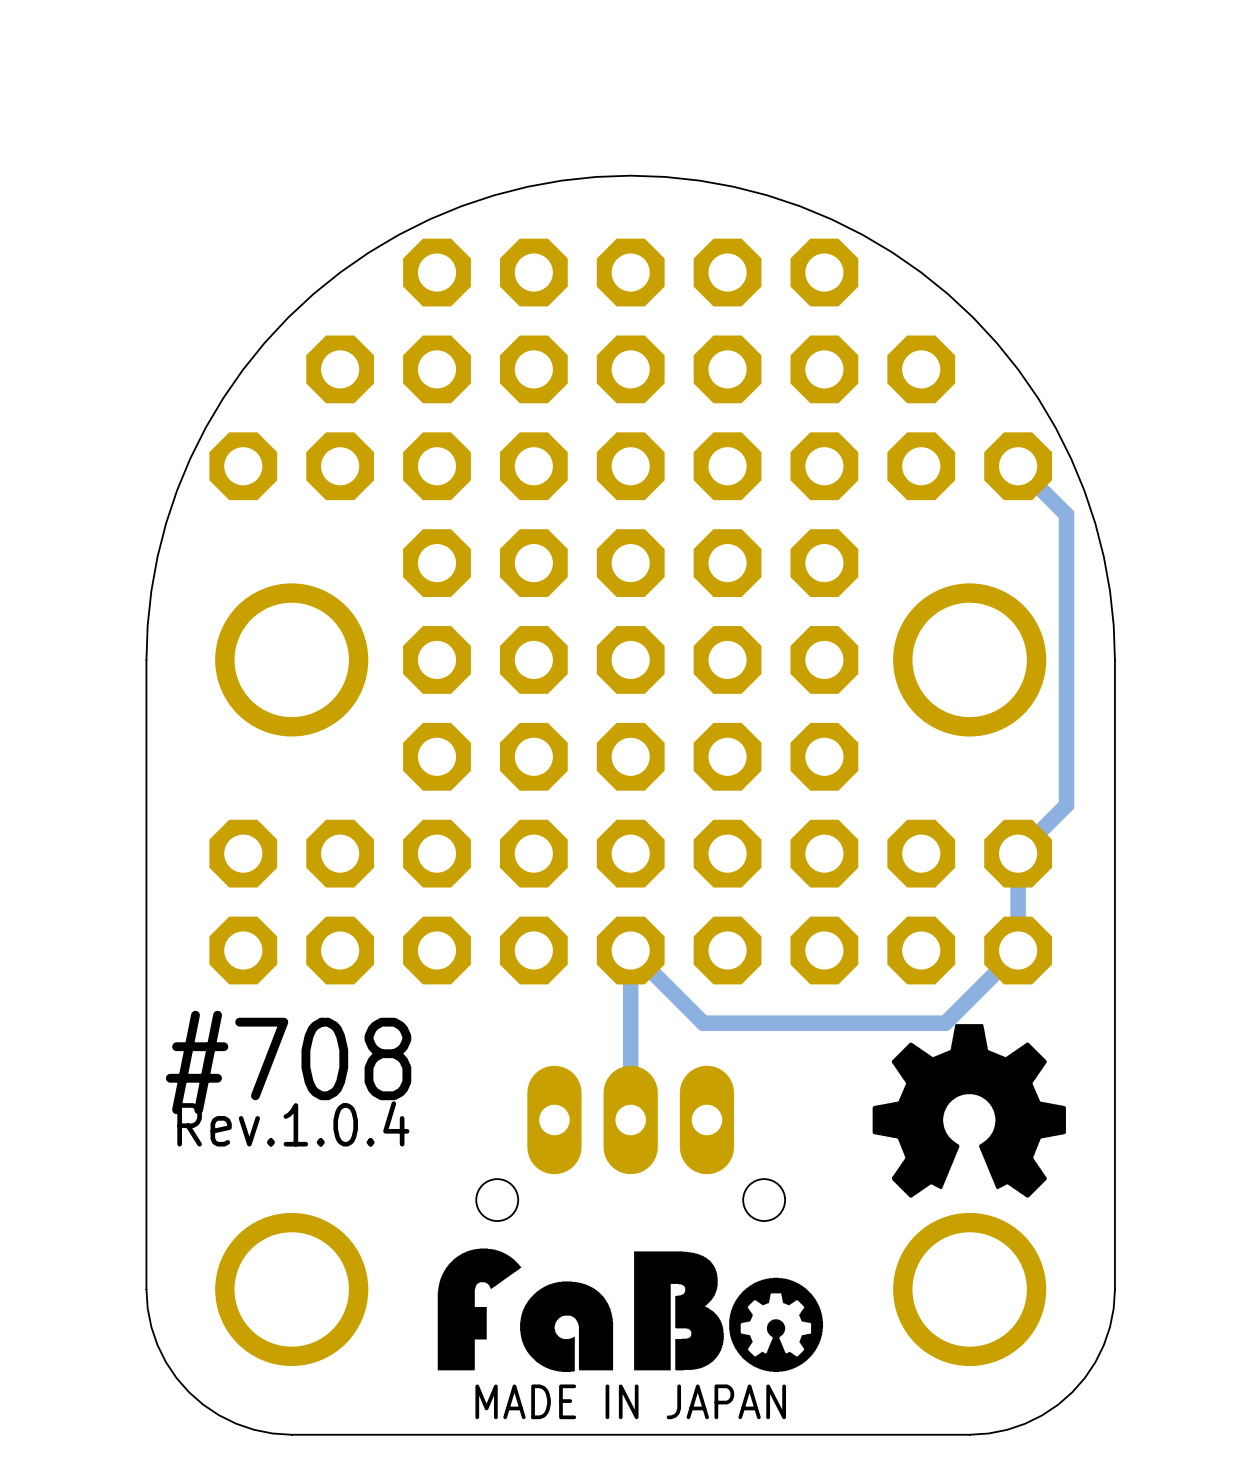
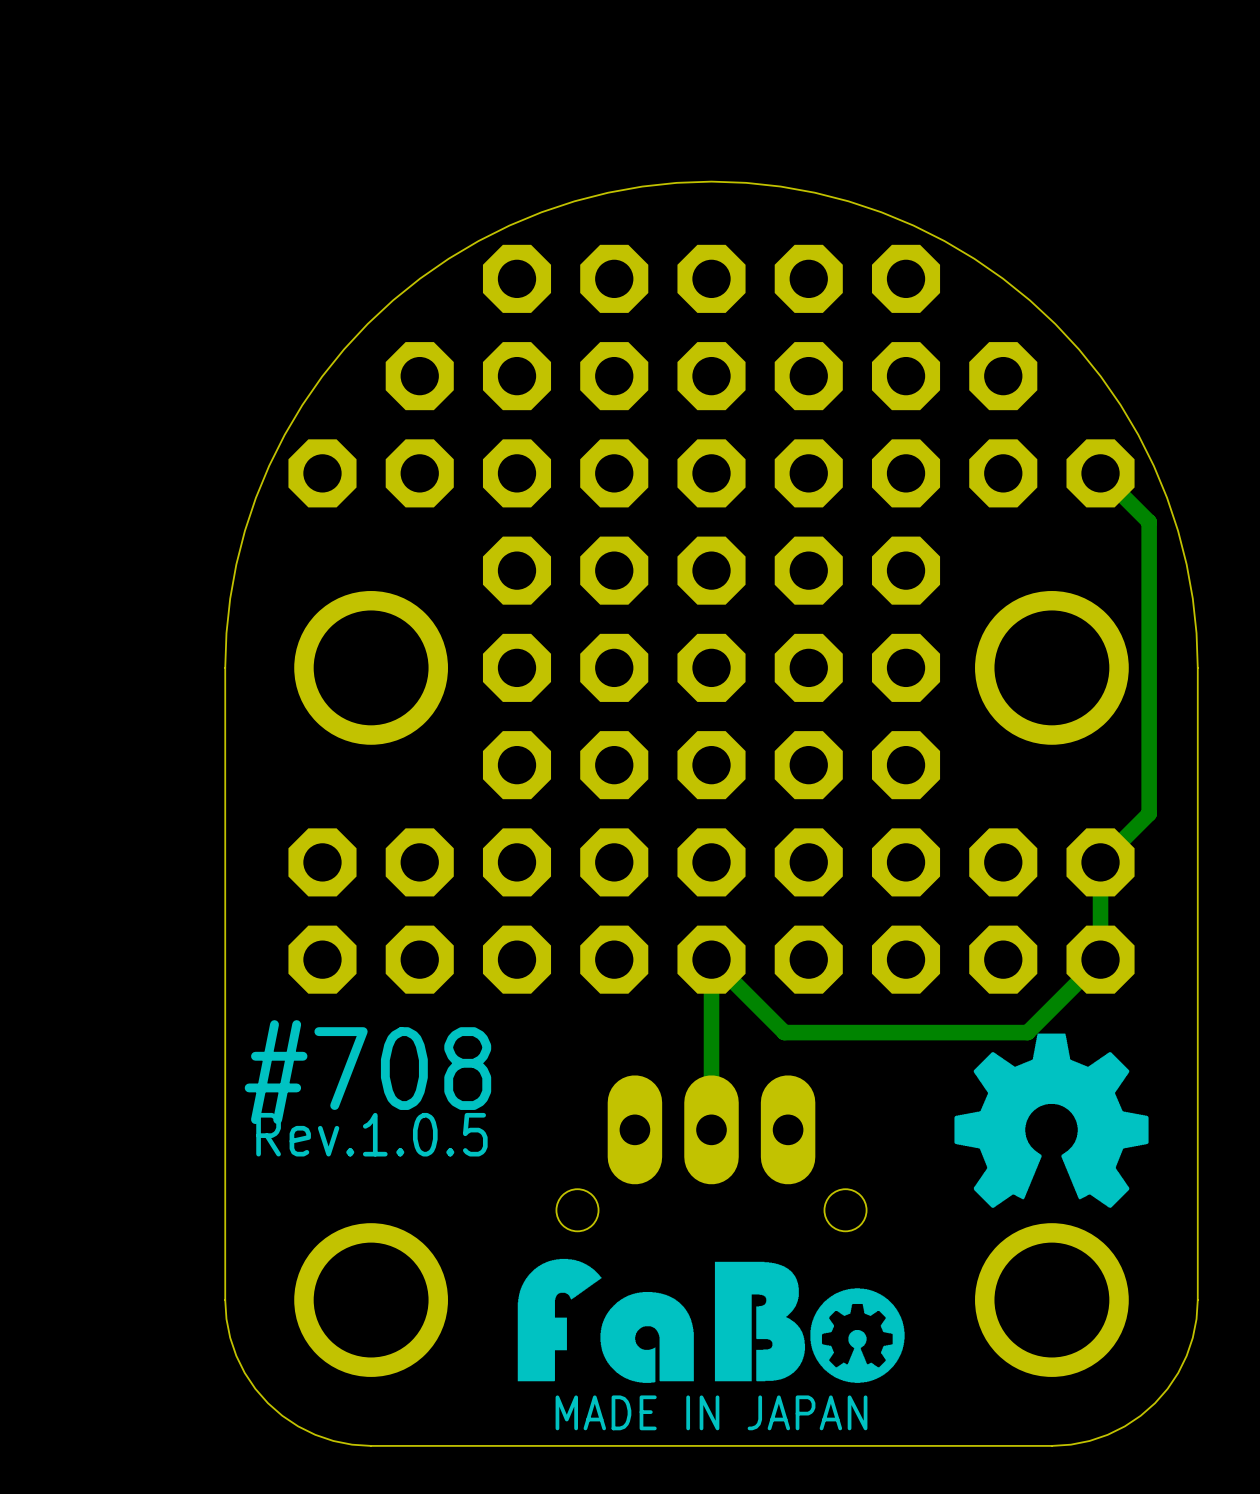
text: Rev.1.0.4 (293, 1123) -> Rev.1.0.5 (371, 1134)

